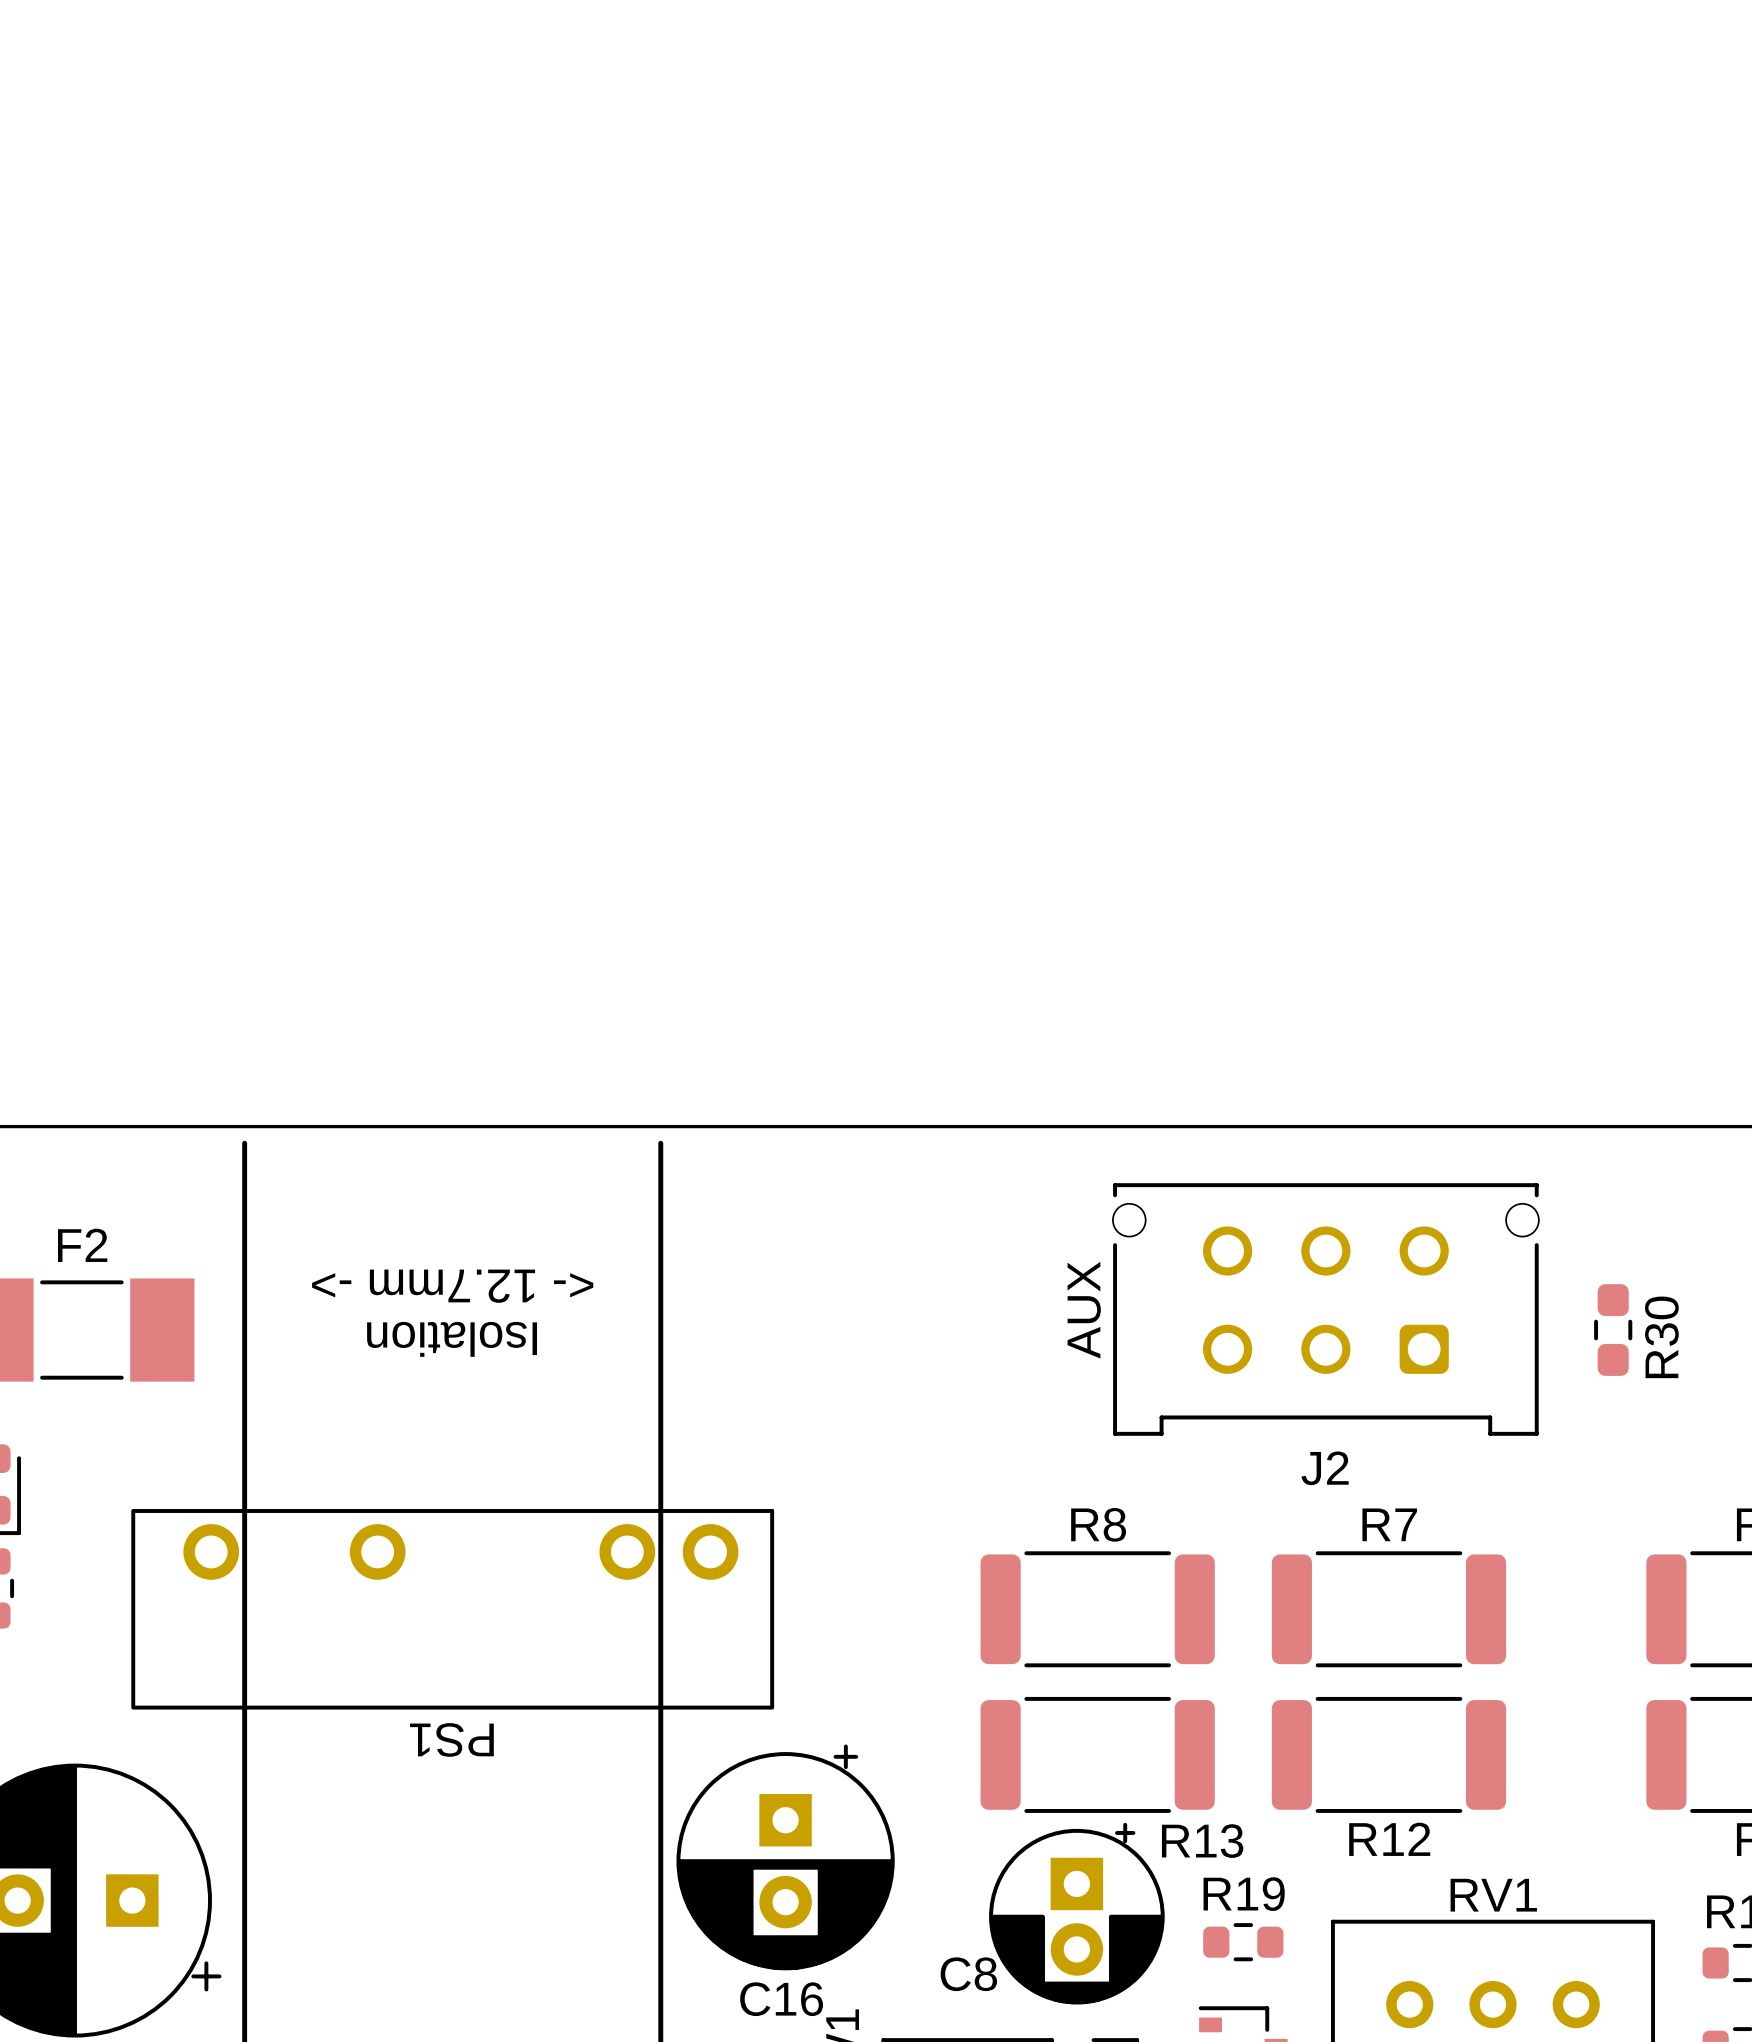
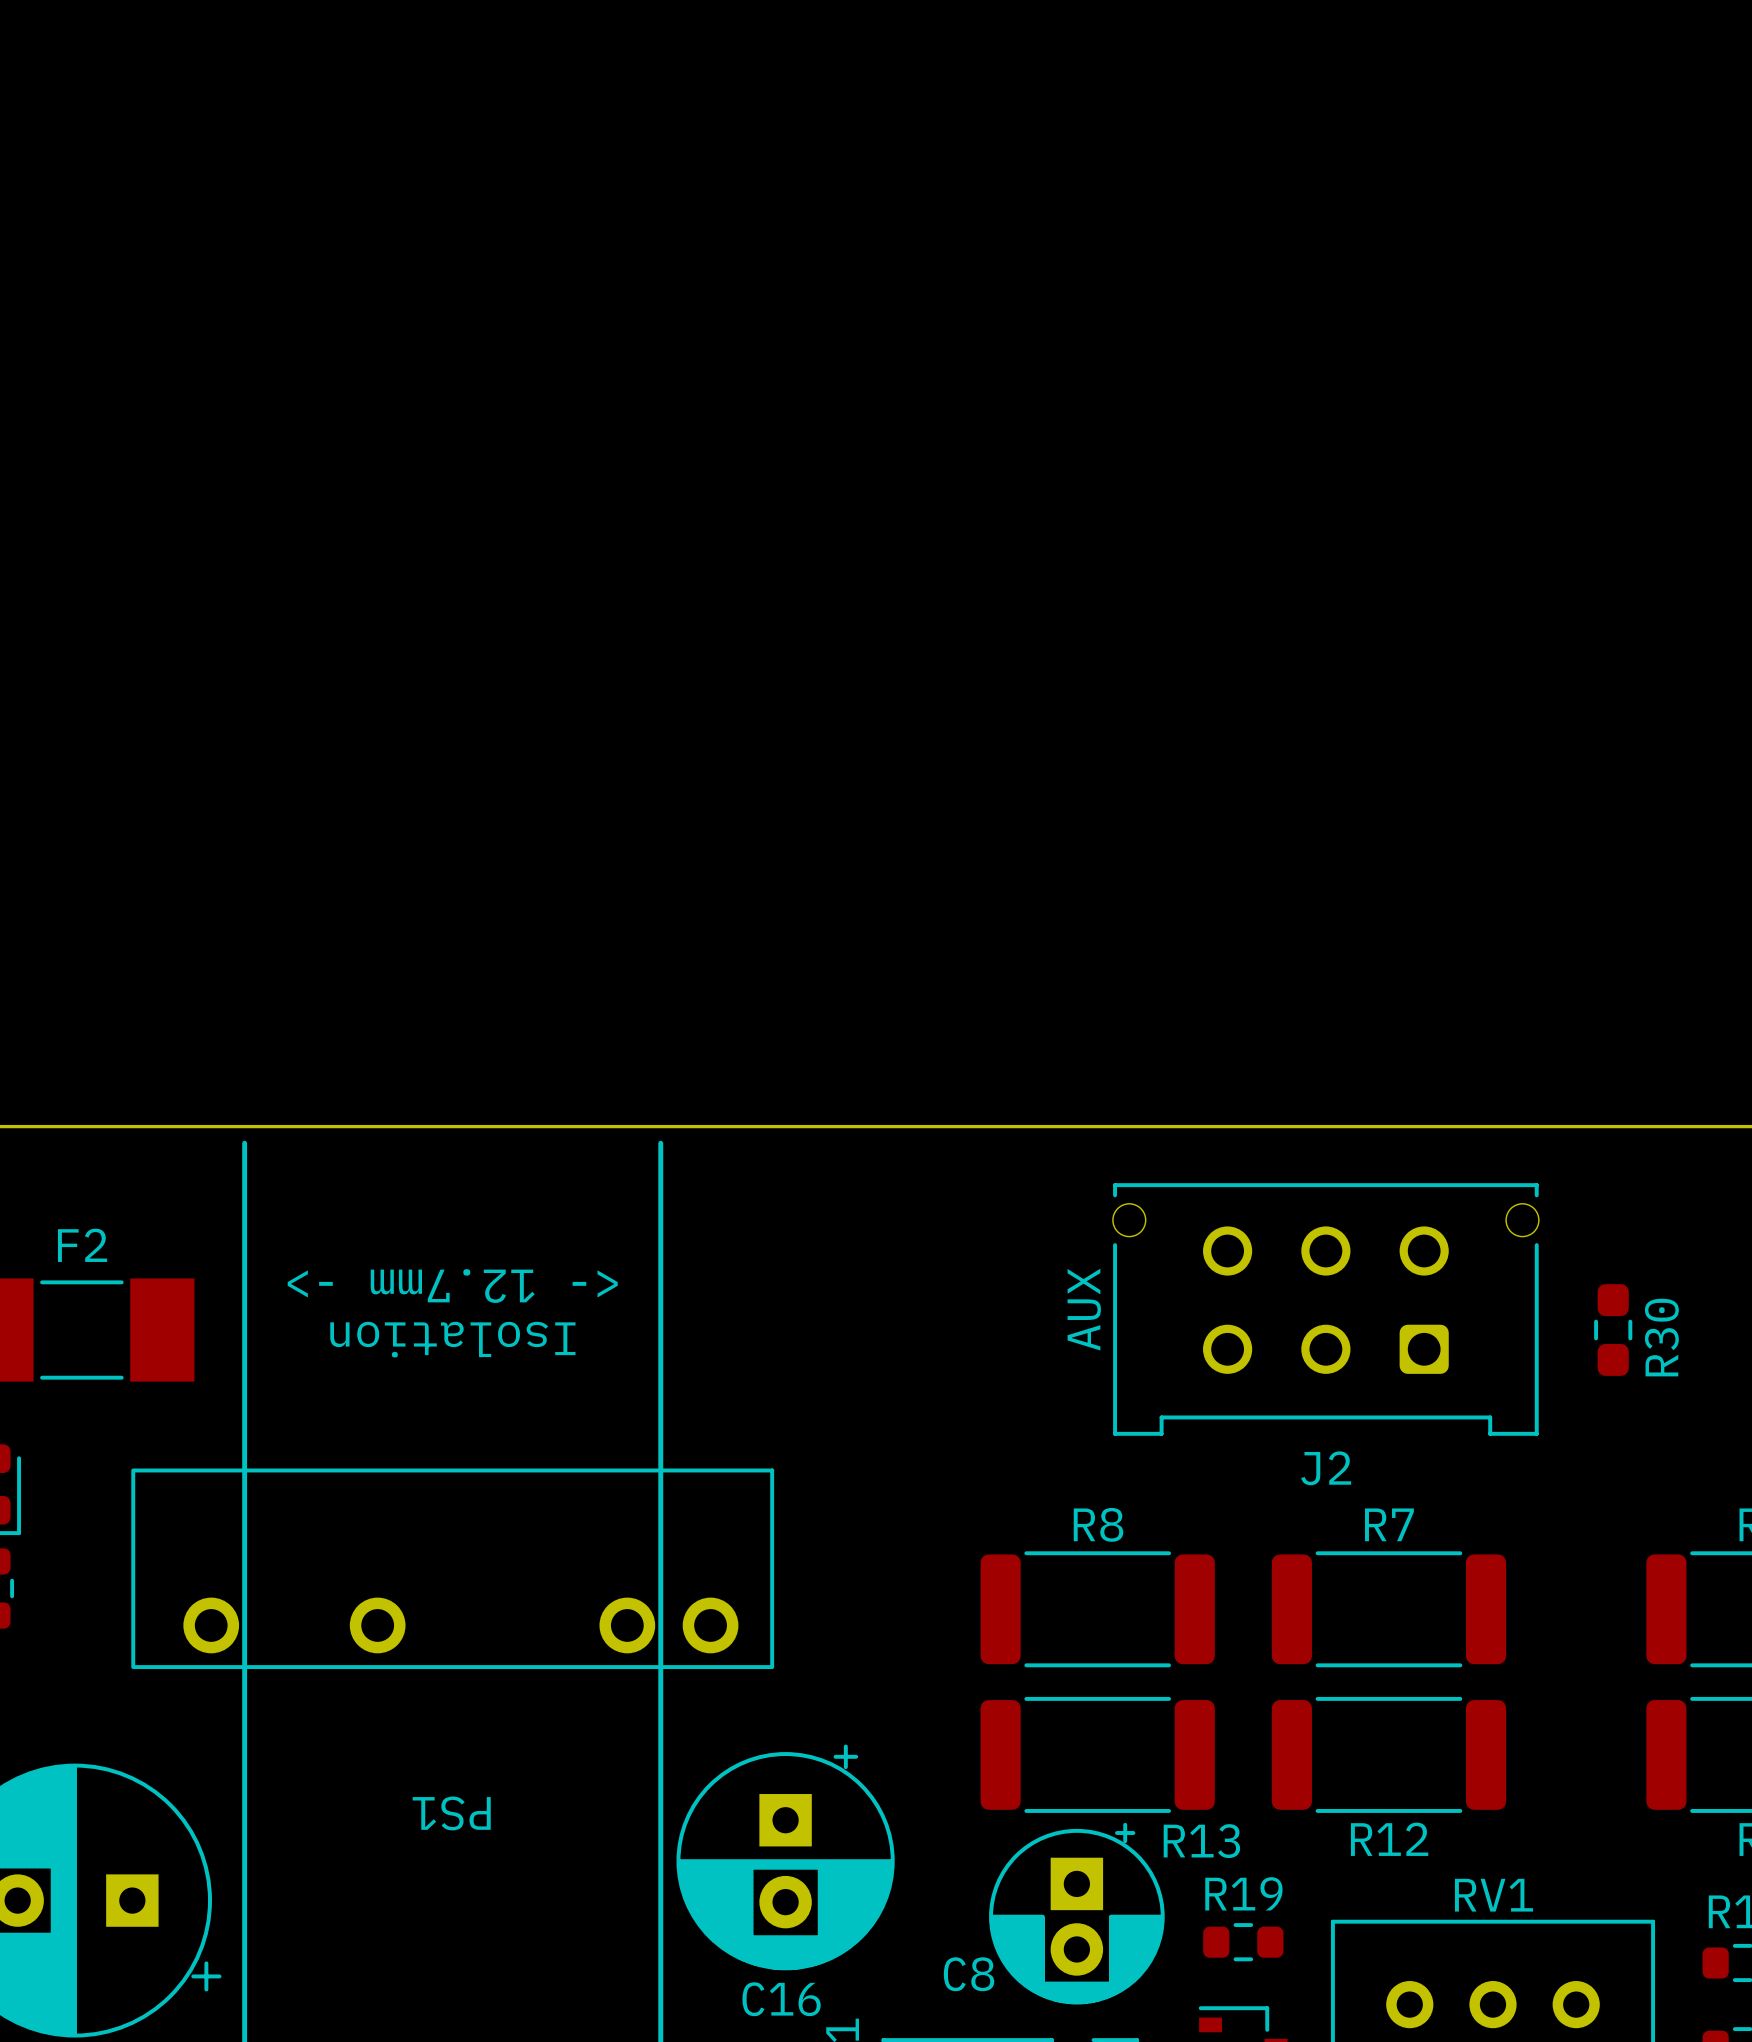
PS1 footprint: [131, 1509, 775, 1710] -> [131, 1468, 775, 1670]
PS1 name position: PS1 (451, 1739) -> PS1 (451, 1813)

